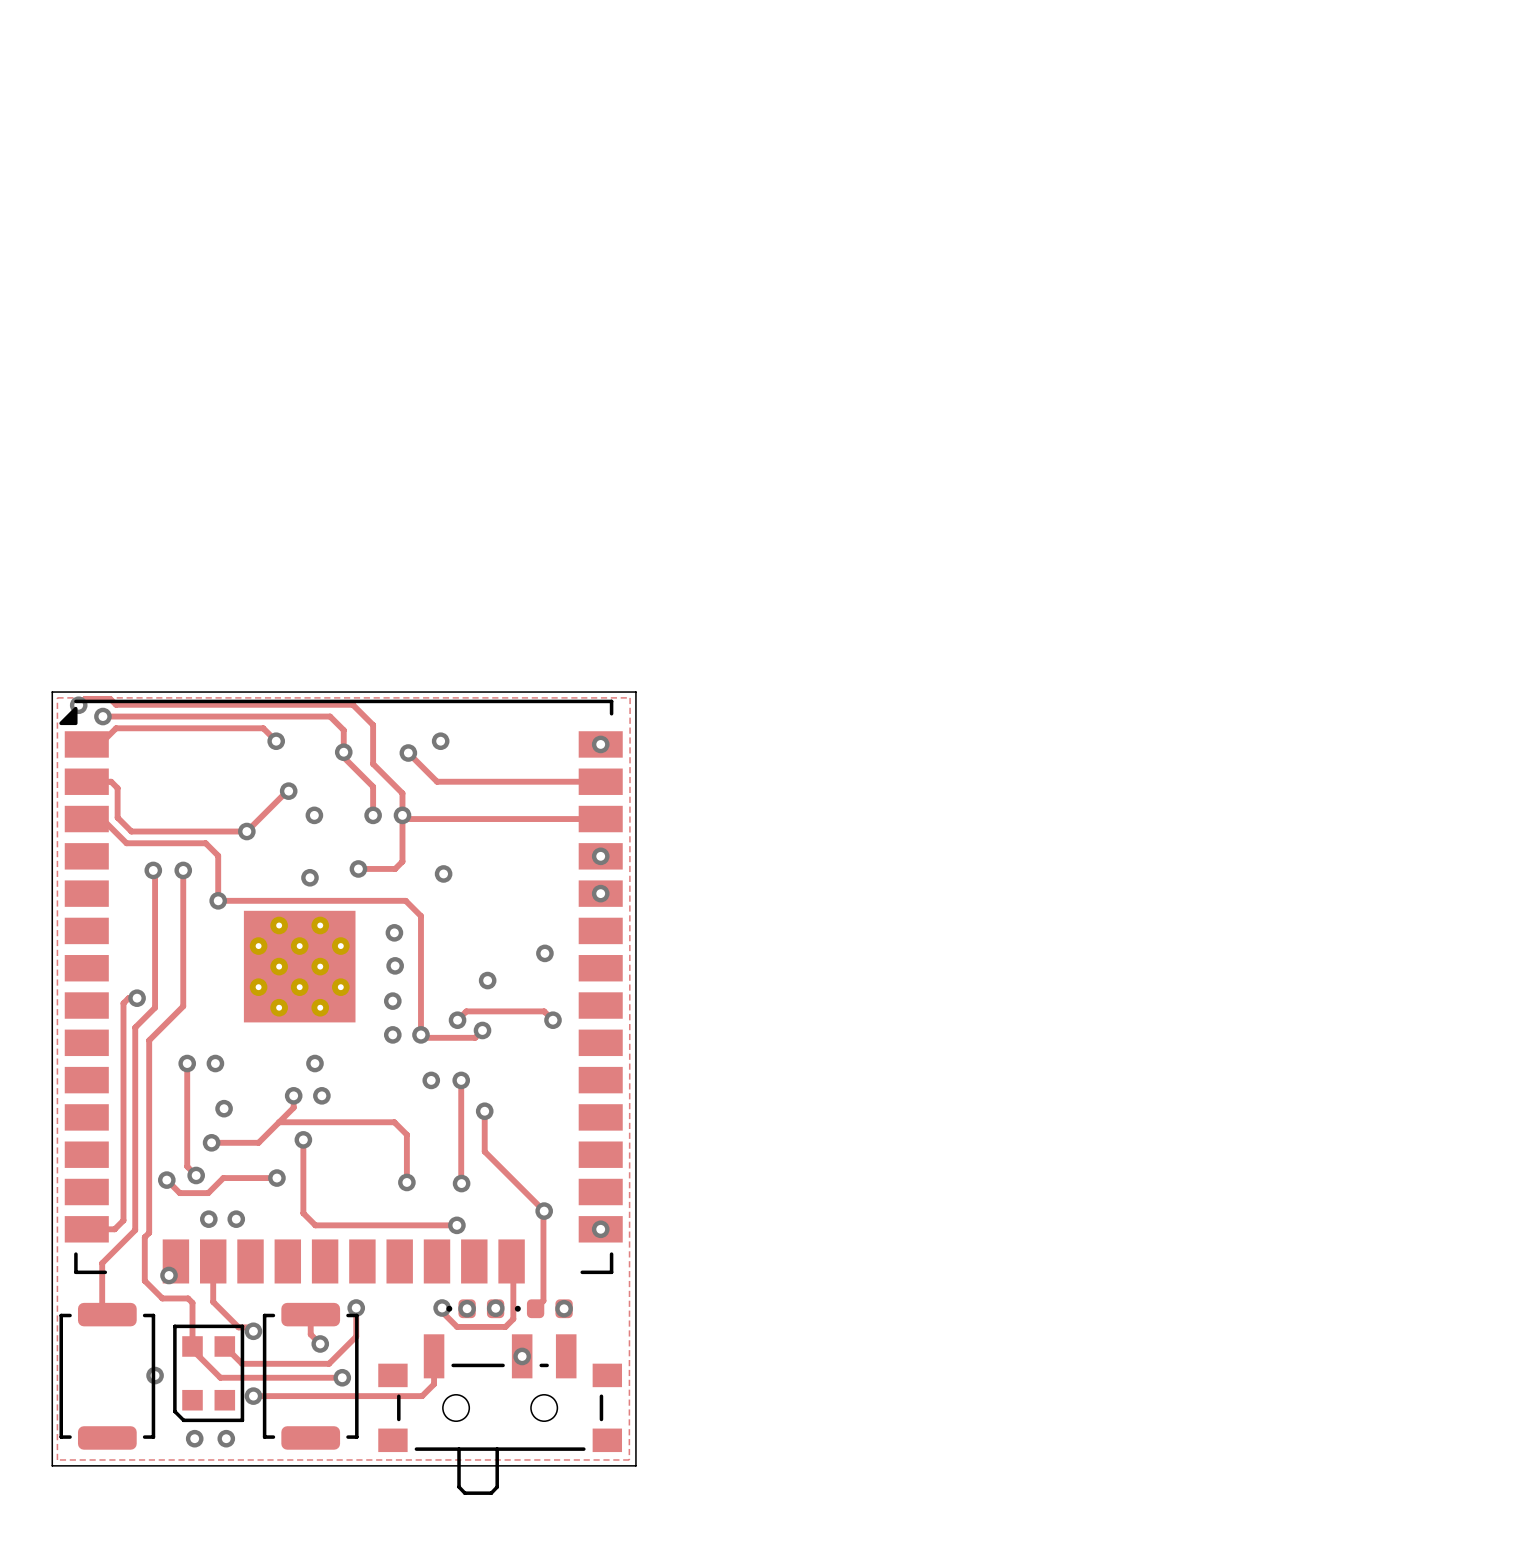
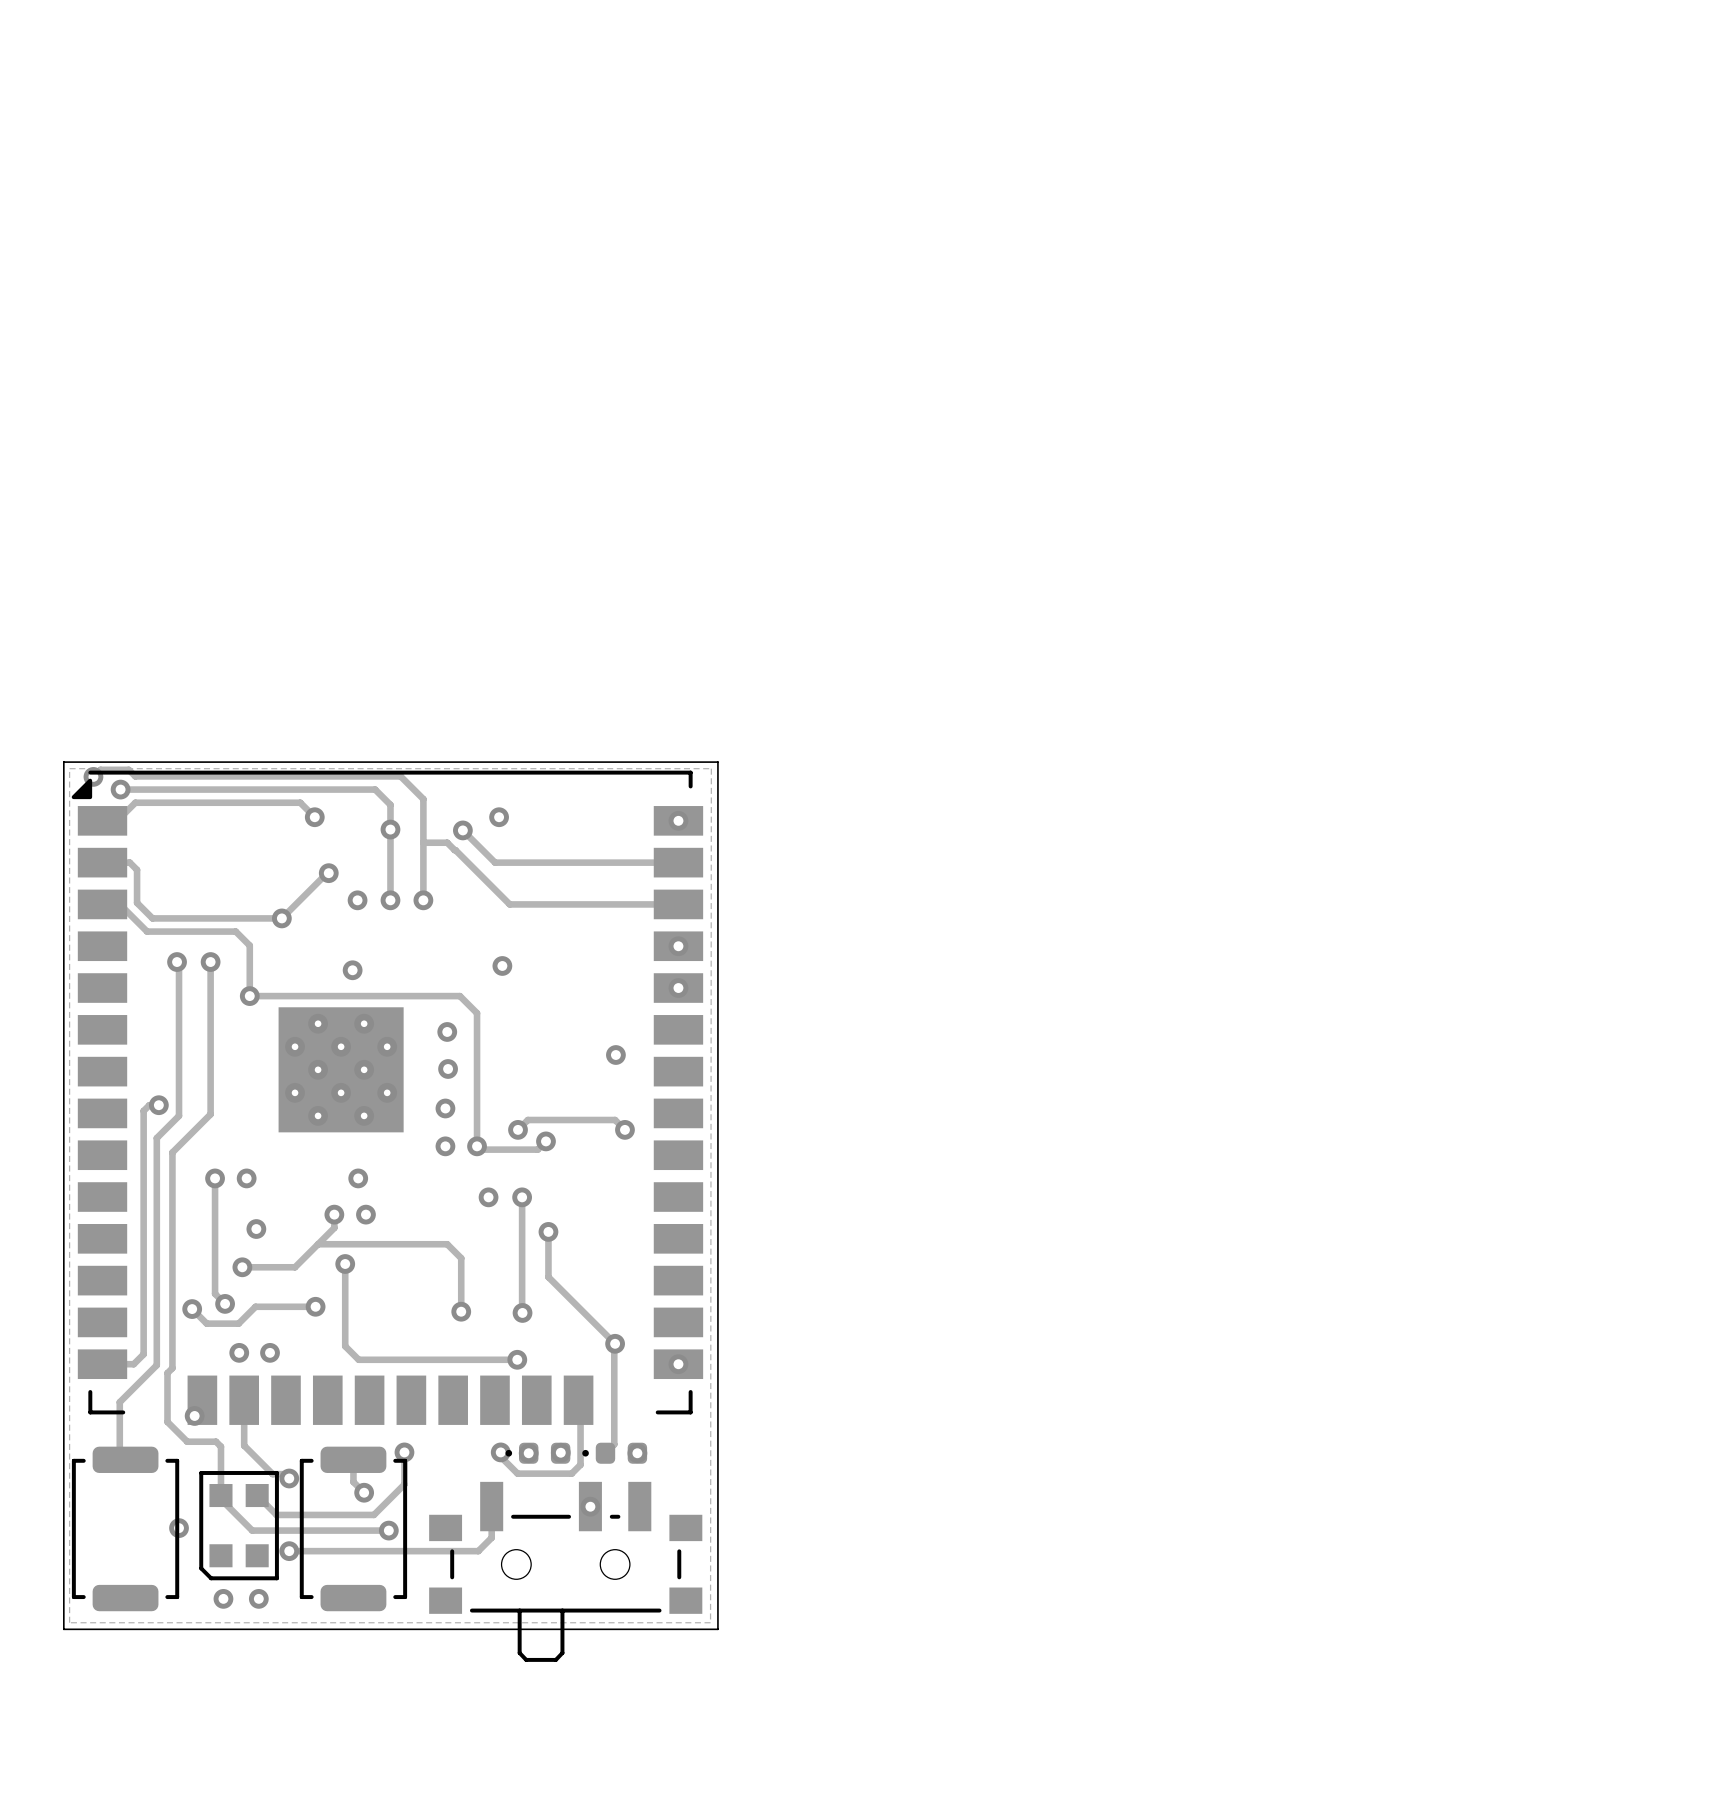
track: (343, 757) (373, 786) -> (390, 835) (390, 900)
track: (373, 763) (402, 793) (402, 861) (395, 868) (358, 868) -> none
via: none -> (390, 900)
track: (402, 815) (406, 819) (450, 819) -> (423, 868) (423, 842) (447, 842) (509, 904)
via: (402, 815) -> none
via: (358, 868) -> none
via: (487, 980) -> none

